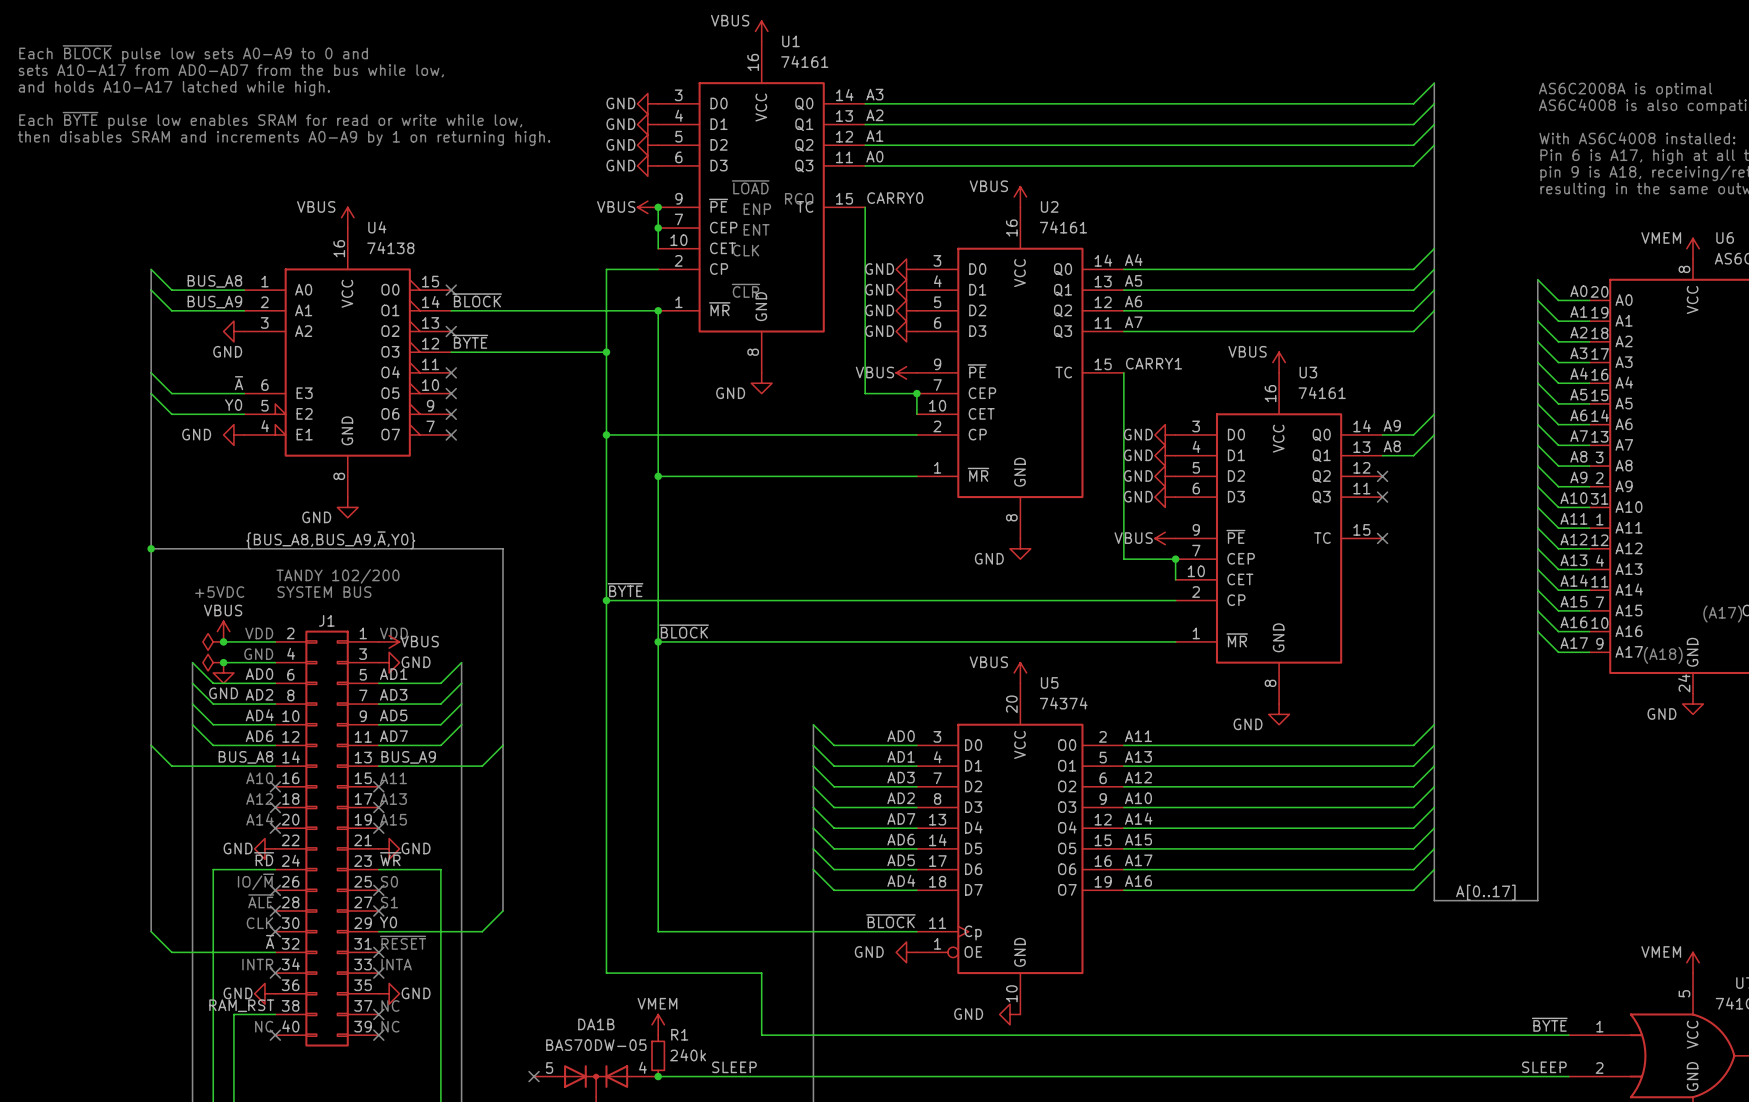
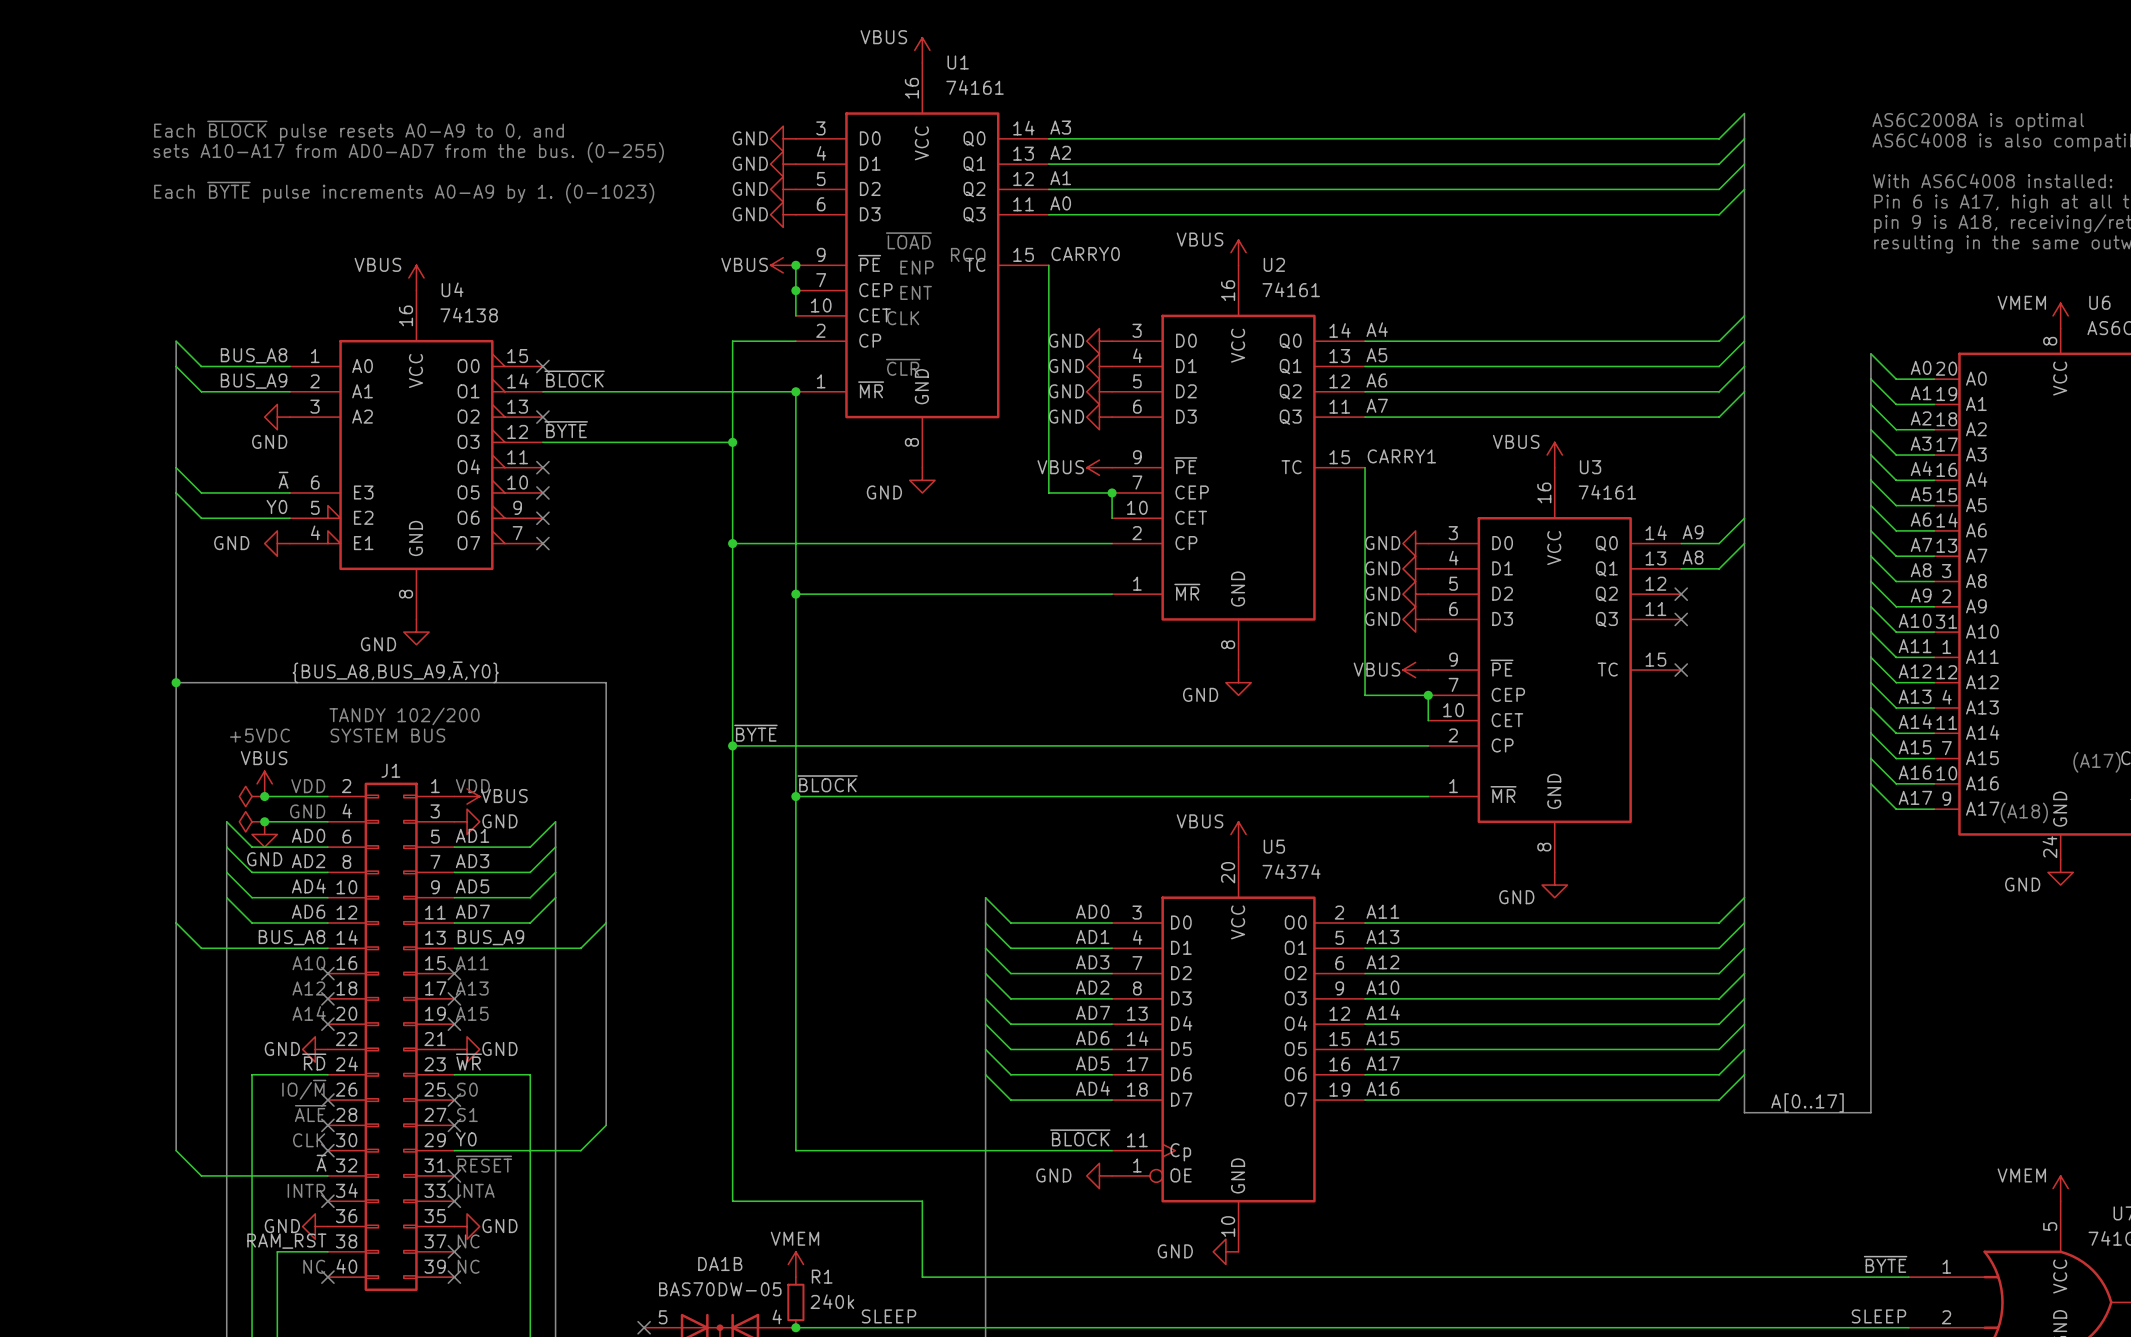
text: Each ~{BLOCK} pulse low sets A0-A9 to 0 and (193, 54) -> none
text: sets A10-A17 from AD0-AD7 from the bus while low, (231, 70) -> none
text: and holds A10-A17 latched while high. (174, 88) -> none
text: none -> Each ~{BLOCK} pulse resets A0-A9 to 0, and (359, 131)
text: none -> sets A10-A17 from AD0-AD7 from the bus. (0-255) (408, 152)
text: Each ~{BYTE} pulse low enables SRAM for read or write while low, (270, 120) -> none
text: then disables SRAM and increments A0-A9 by 1 on returning high. (284, 138) -> none
text: none -> Each ~{BYTE} pulse increments A0-A9 by 1. (0-1023) (404, 192)

